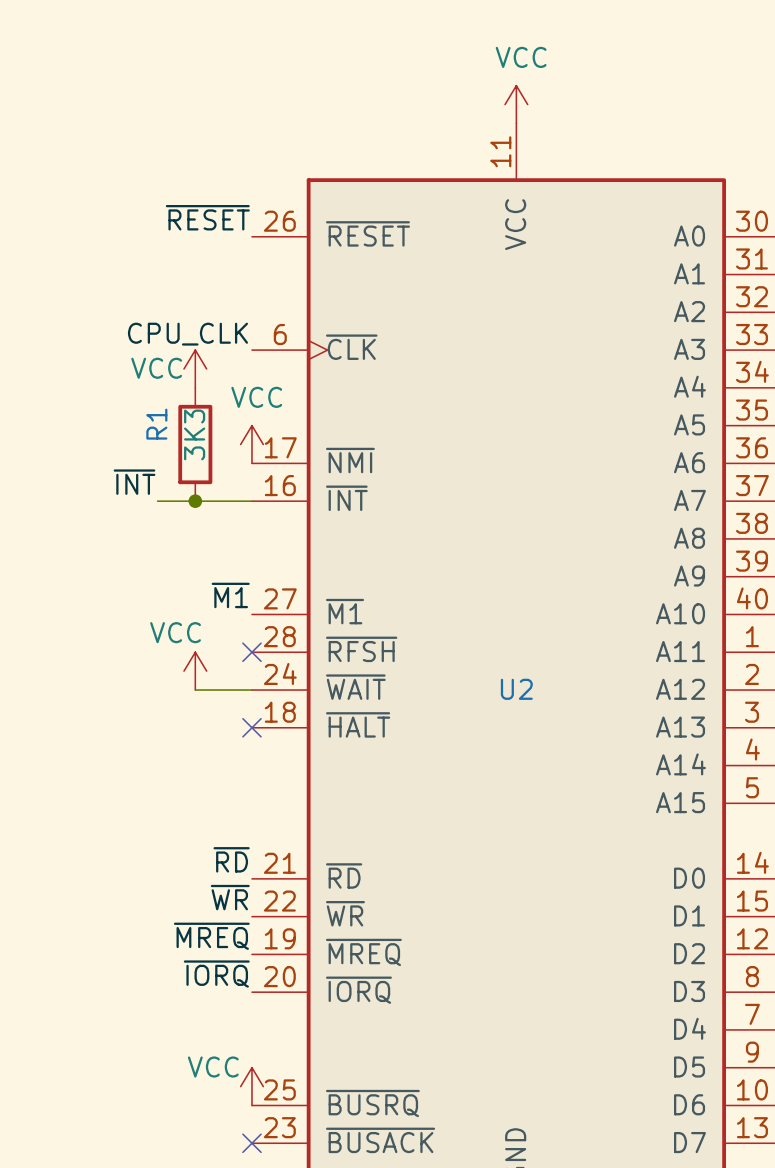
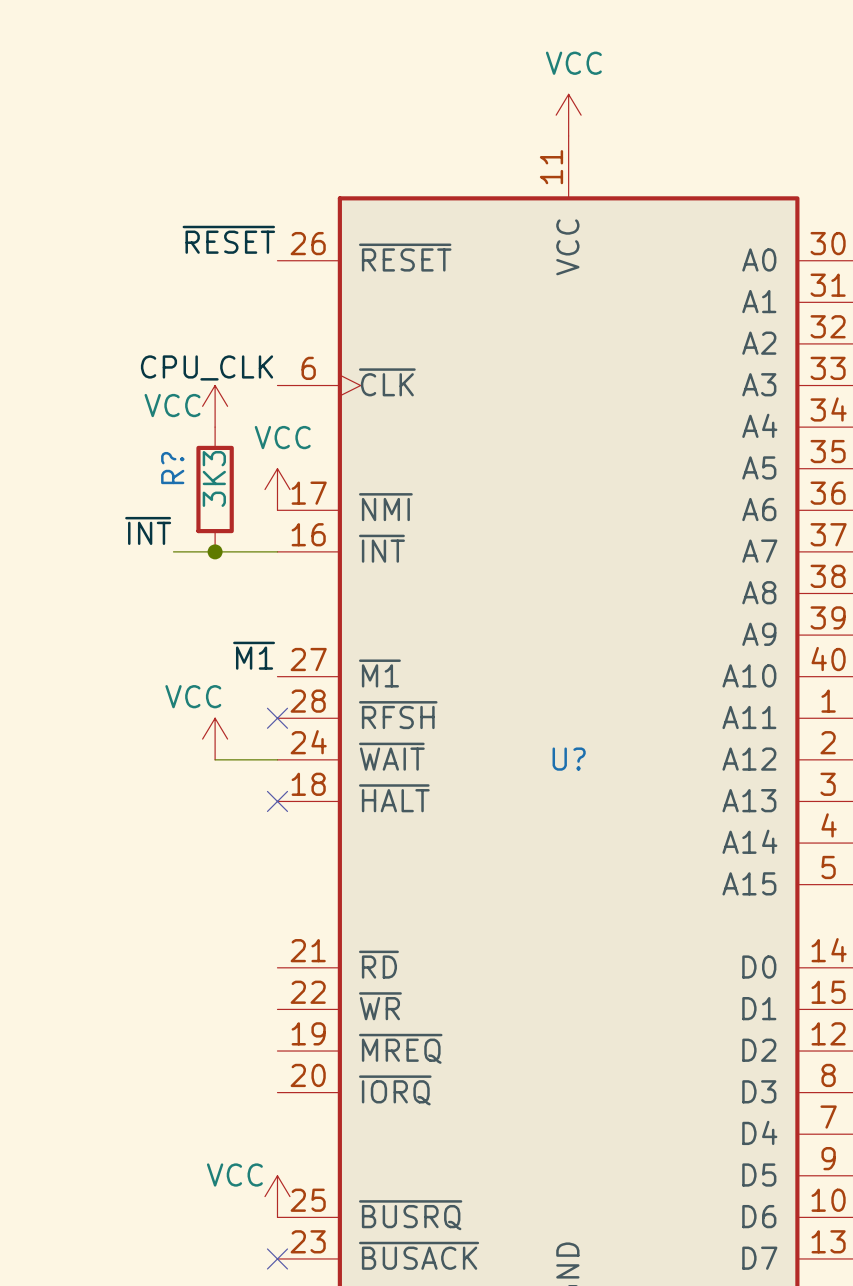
R1 name: R1 (156, 424) -> R? (172, 468)
U2 name: U2 (516, 689) -> U? (569, 759)
label: ~{RD} (231, 859) -> none
label: ~{WR} (230, 897) -> none
label: ~{MREQ} (211, 936) -> none
label: ~{IORQ} (216, 974) -> none

